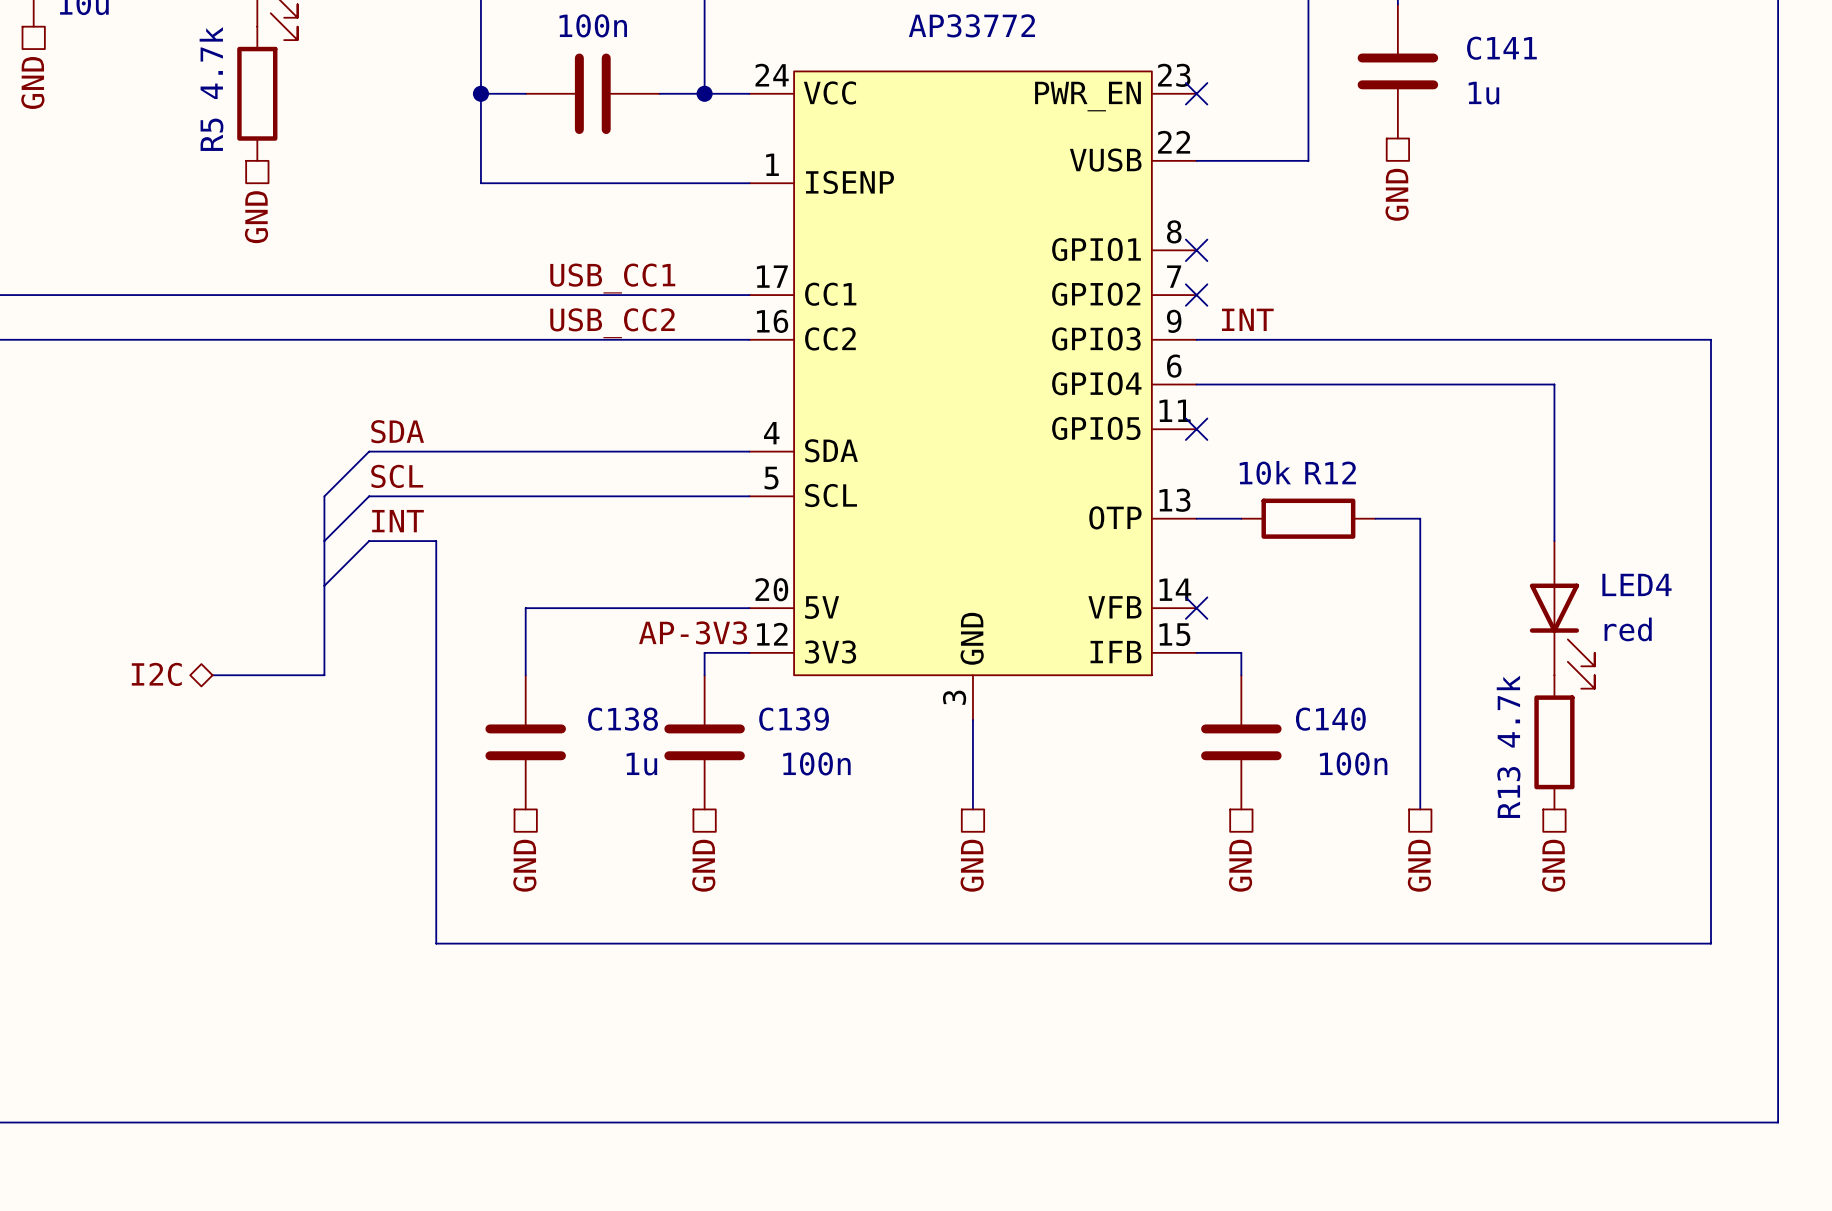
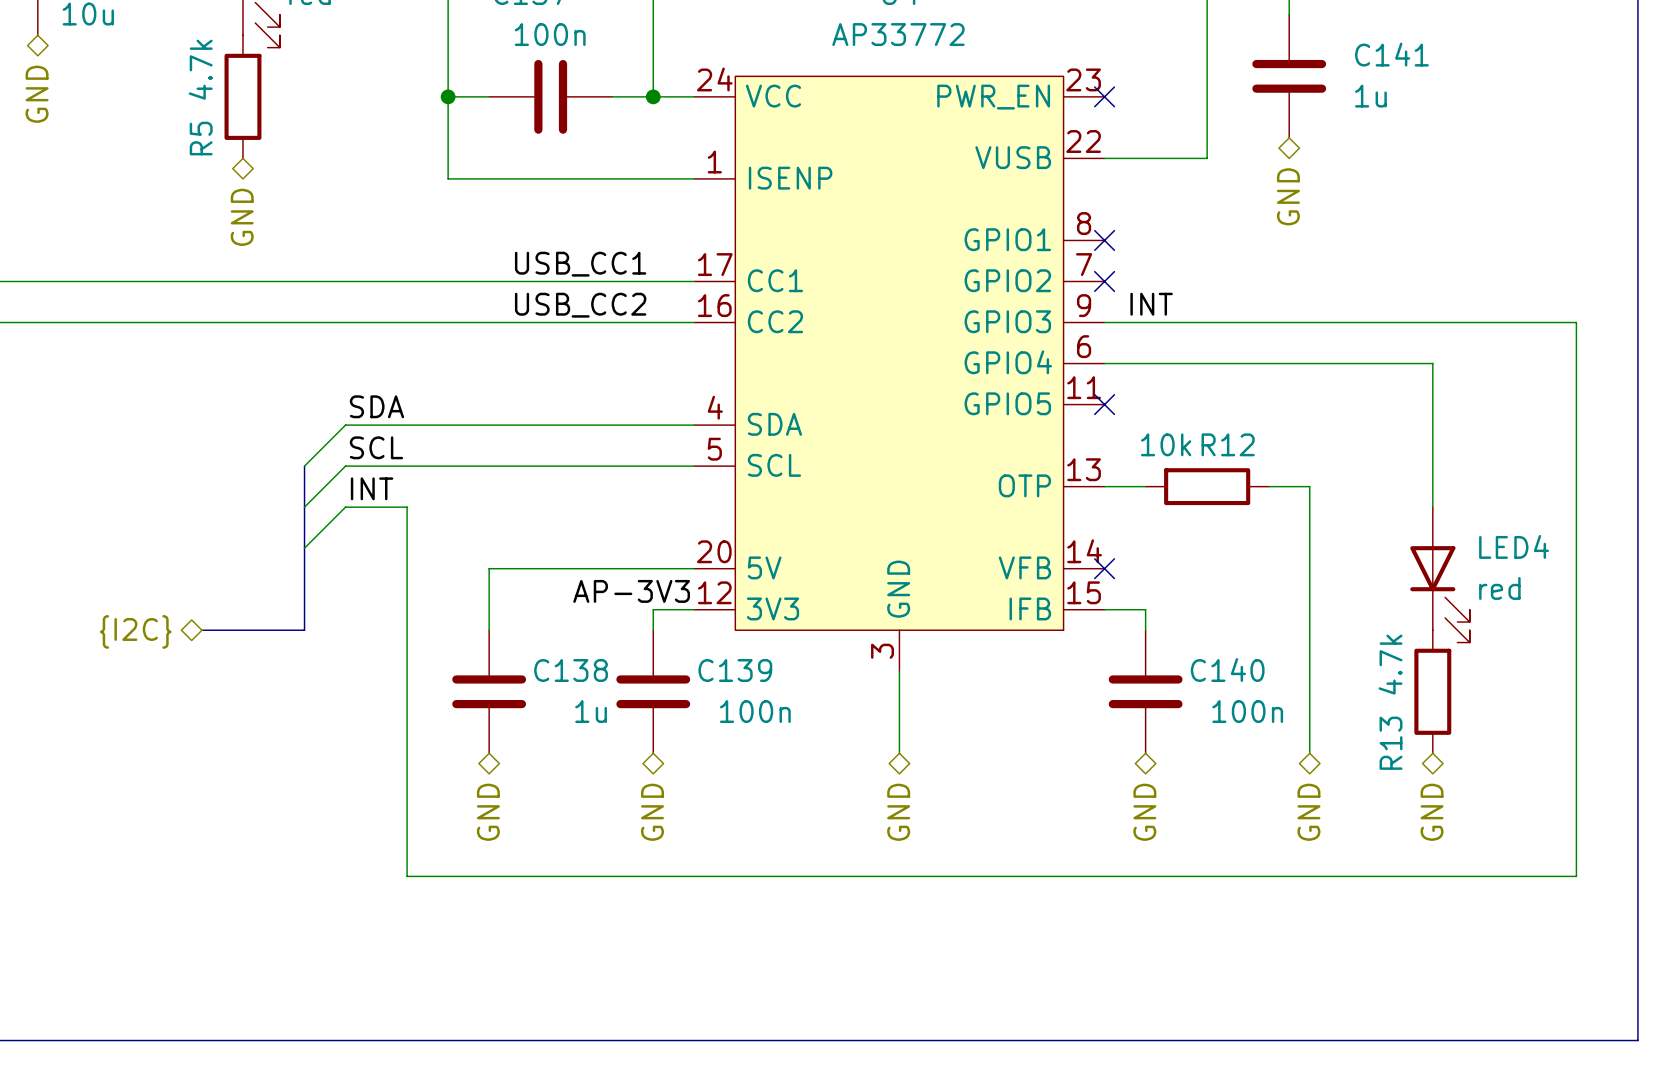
hierarchical label shape: passive (32, 82) -> bidirectional (37, 94)
hierarchical label shape: passive (1397, 194) -> bidirectional (1288, 196)
hierarchical label shape: passive (256, 217) -> bidirectional (242, 217)
hierarchical label: I2C (156, 674) -> {I2C} (135, 631)
hierarchical label shape: passive (524, 865) -> bidirectional (488, 812)
hierarchical label shape: passive (703, 865) -> bidirectional (652, 812)
hierarchical label shape: passive (972, 865) -> bidirectional (898, 812)
hierarchical label shape: passive (1240, 865) -> bidirectional (1144, 812)
hierarchical label shape: passive (1419, 865) -> bidirectional (1308, 812)
hierarchical label shape: passive (1553, 865) -> bidirectional (1432, 812)

